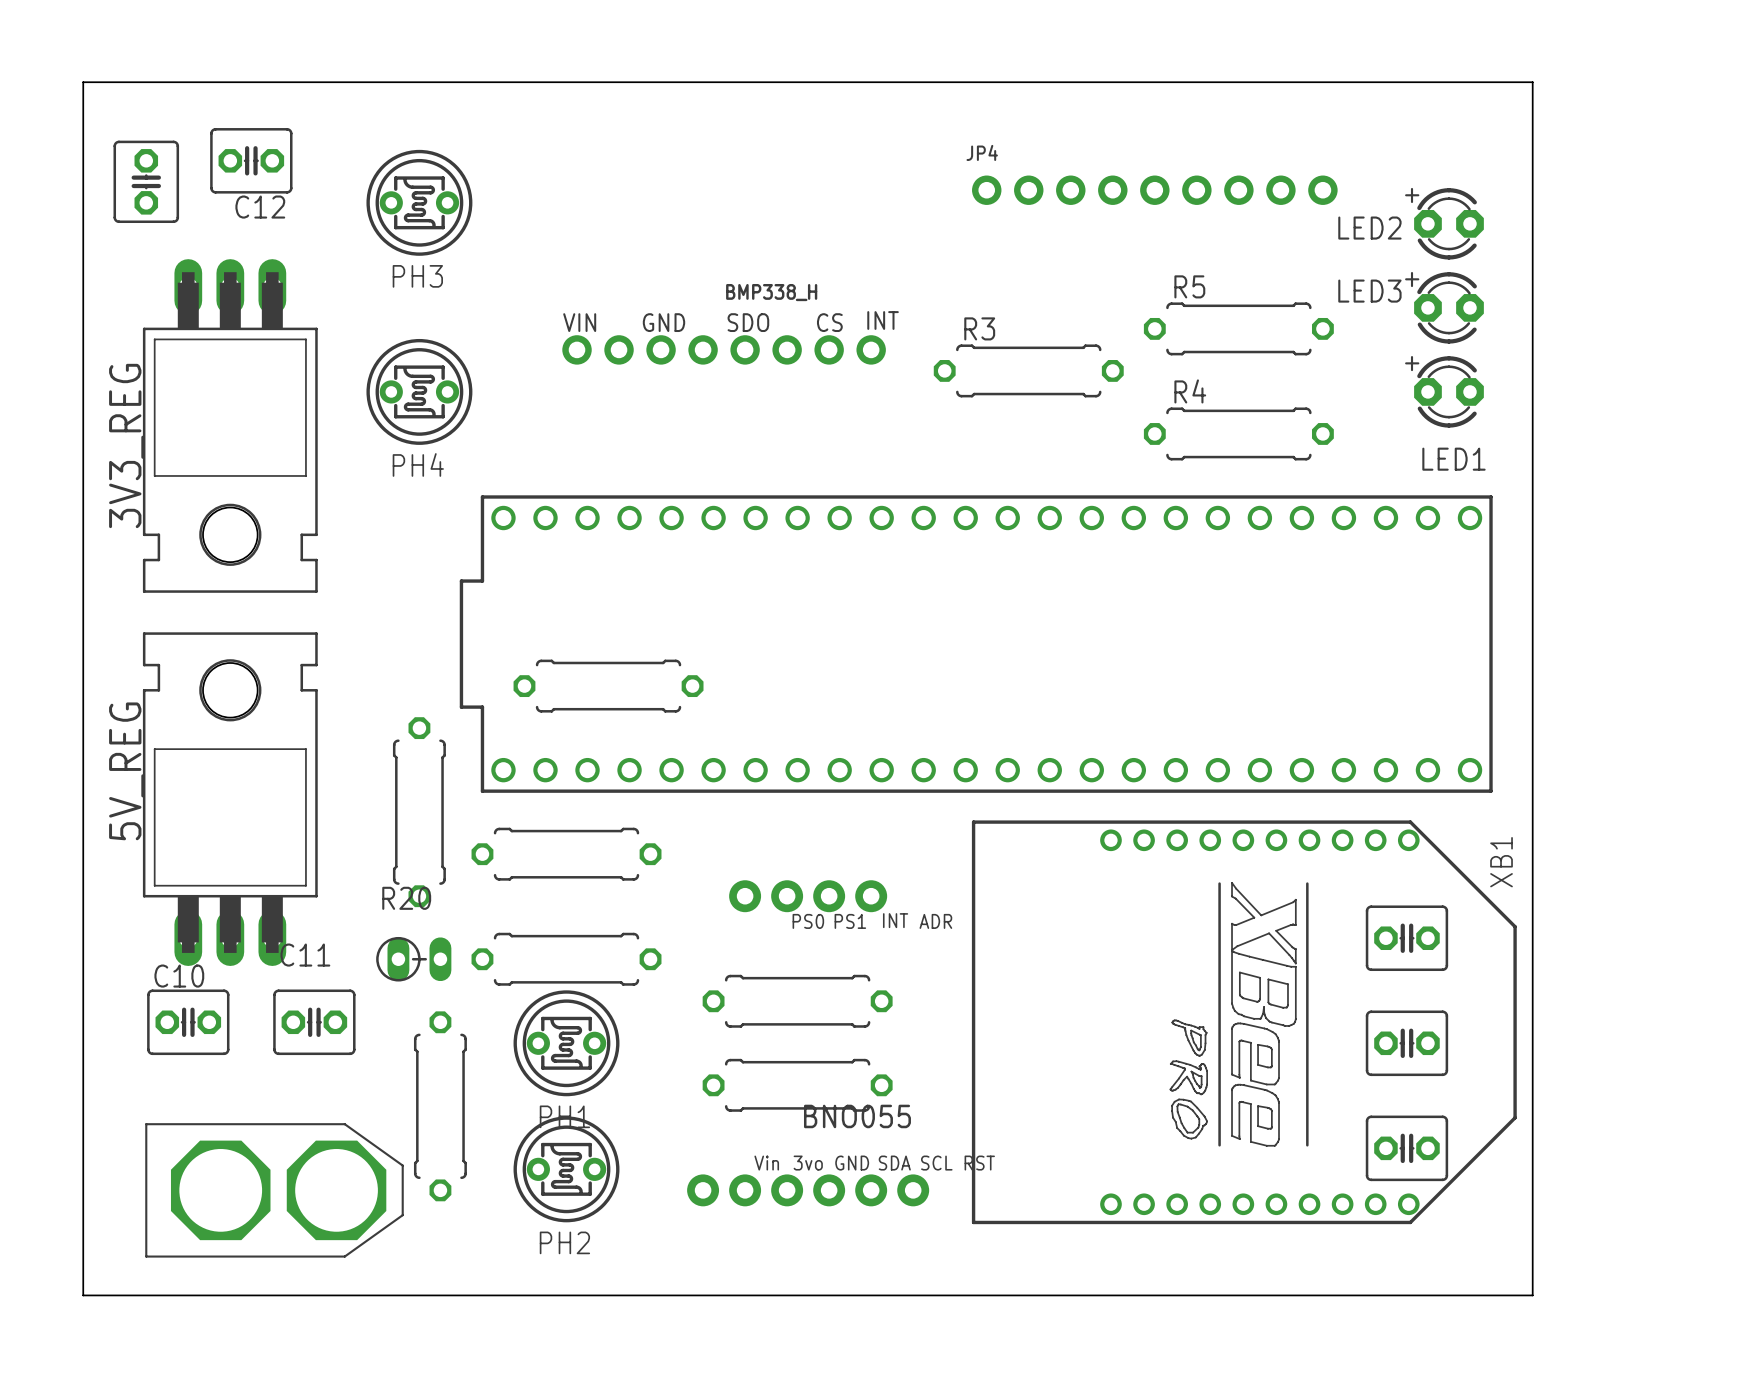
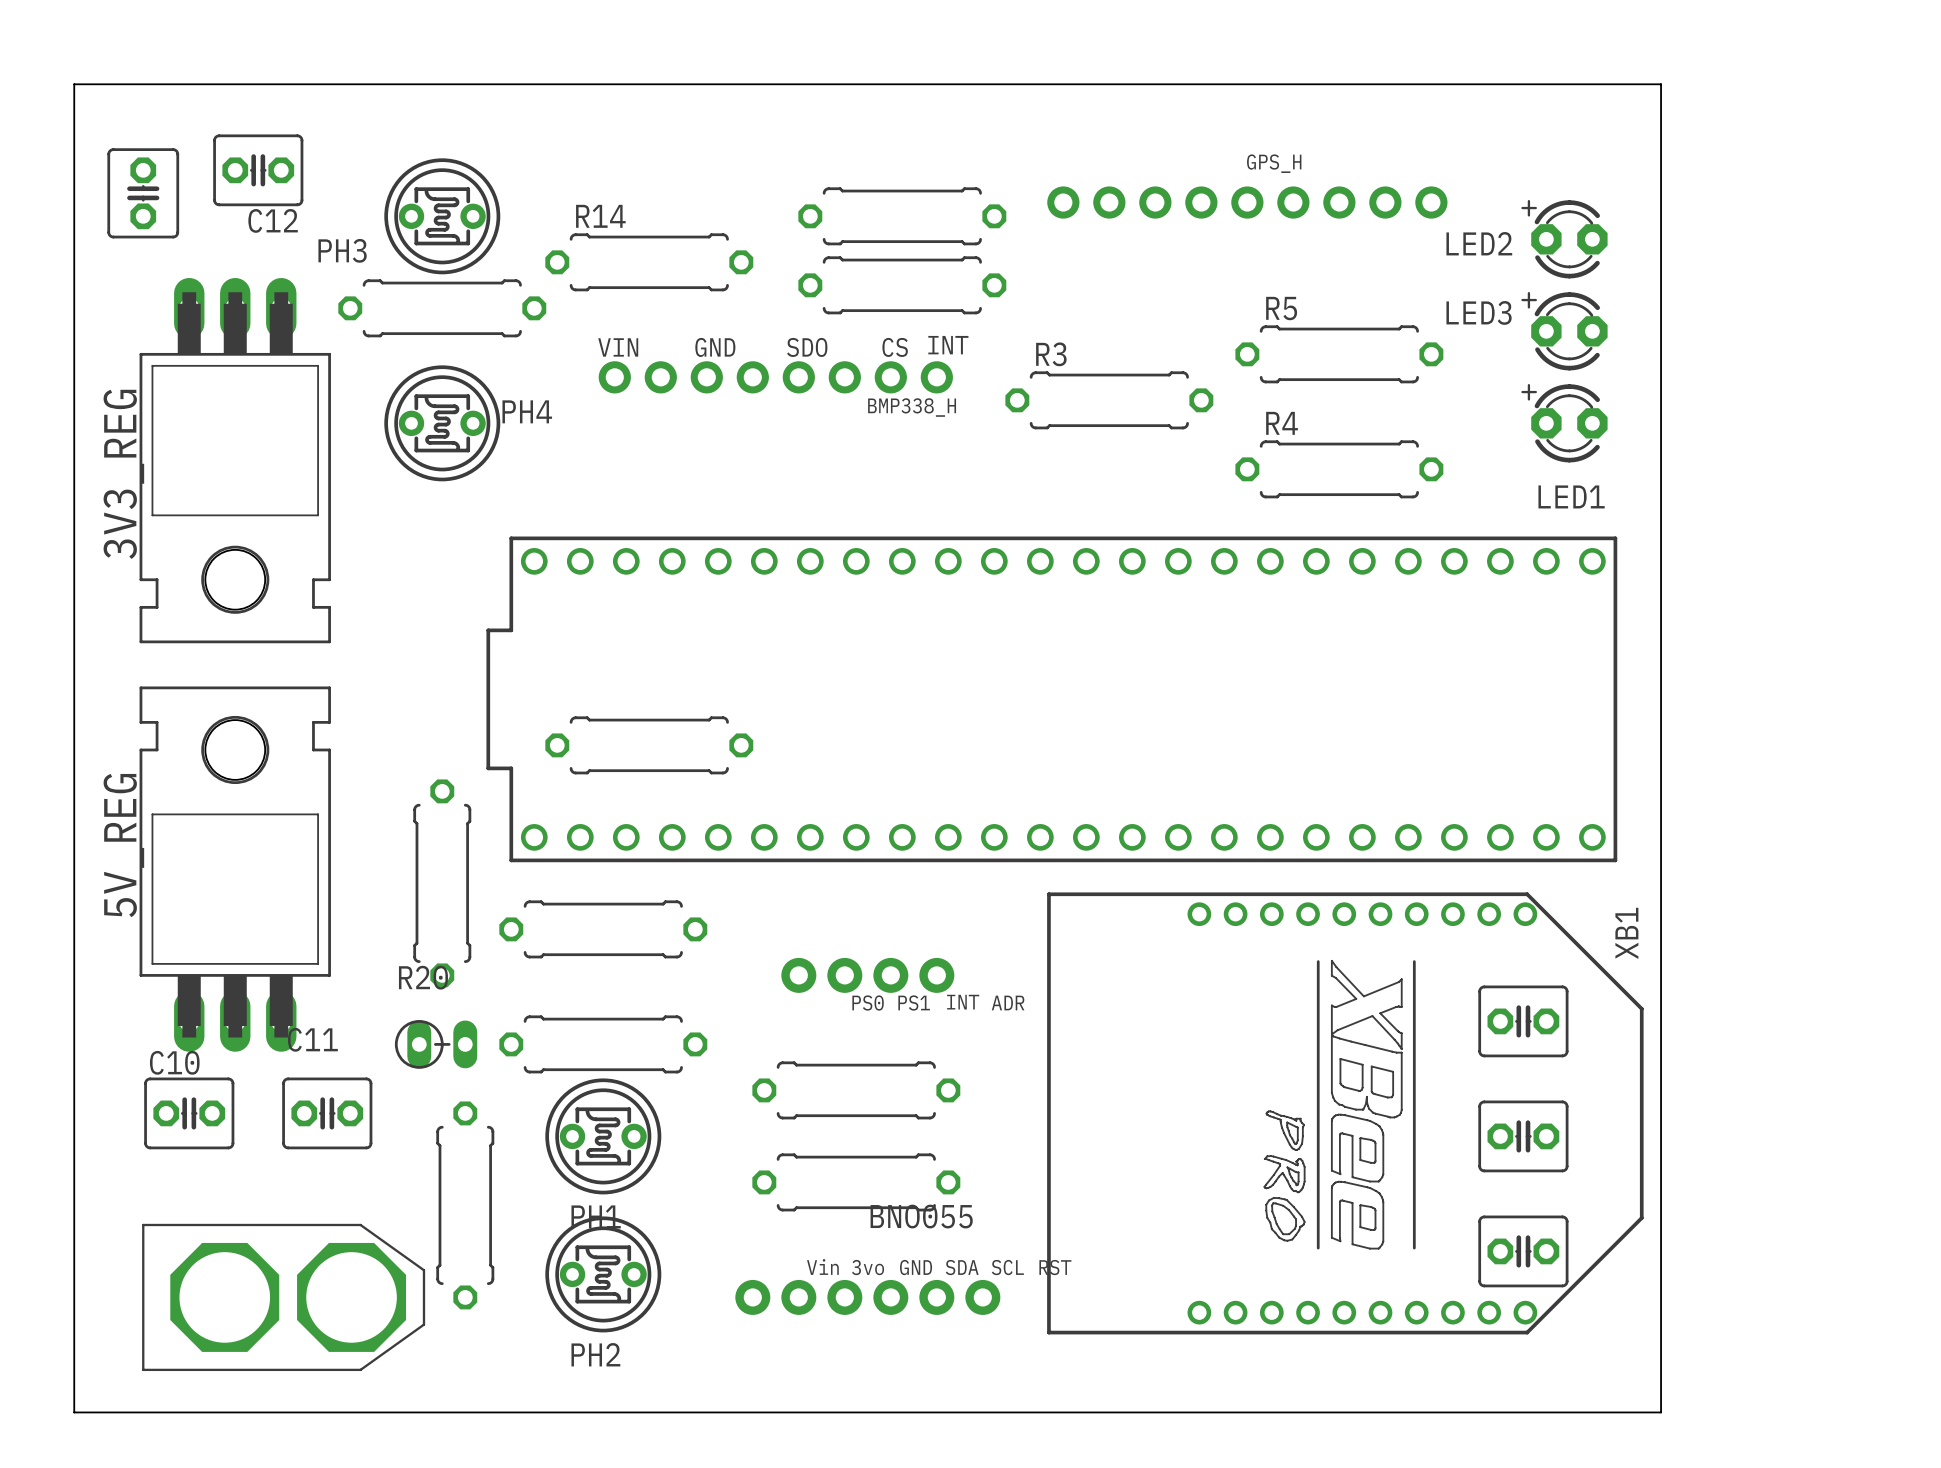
JP4 name: JP4 (982, 152) -> GPS_H (1274, 163)
part: none -> (902, 216)
R14: none -> (649, 262)
part: none -> (902, 285)
PH3 name position: PH3 (417, 276) -> PH3 (342, 250)
part: none -> (442, 308)
BMP338_H name position: BMP338_H (771, 292) -> BMP338_H (912, 407)
PH4 name position: PH4 (418, 464) -> PH4 (527, 411)

